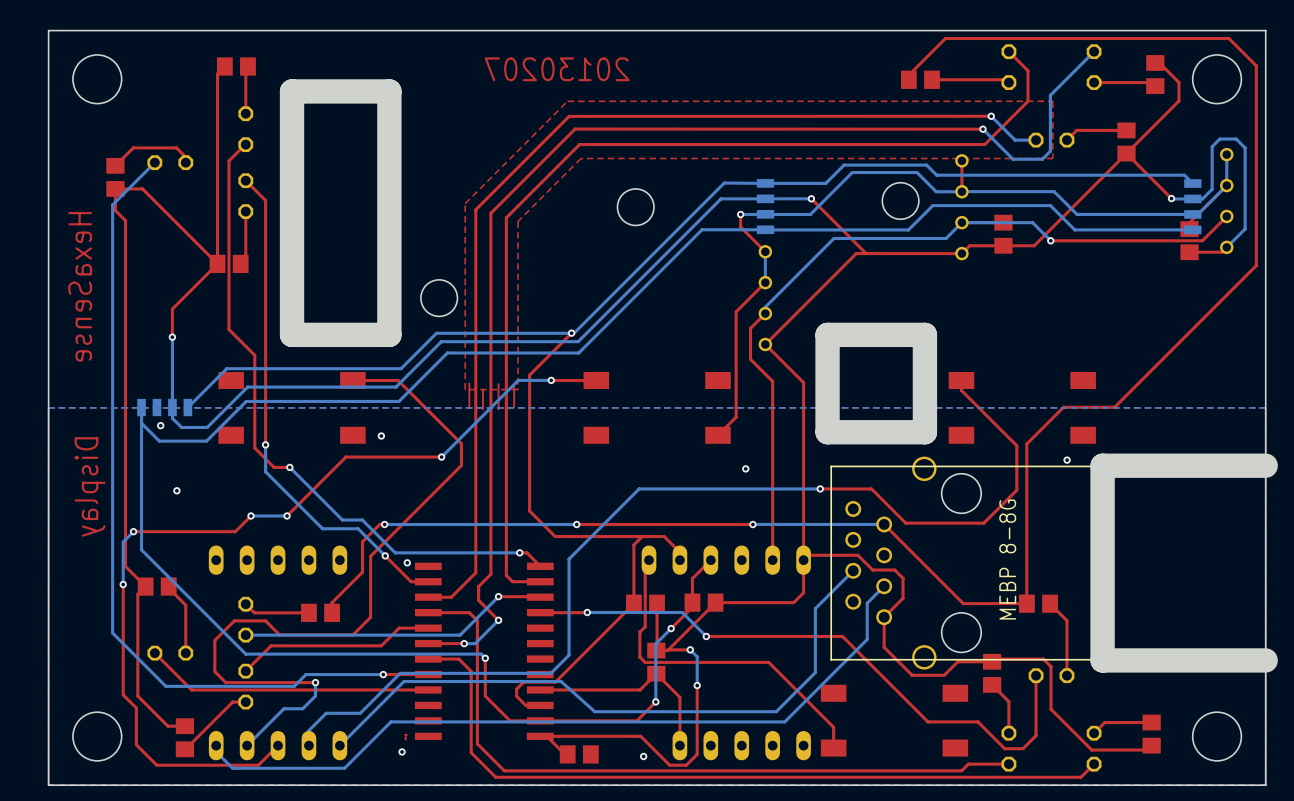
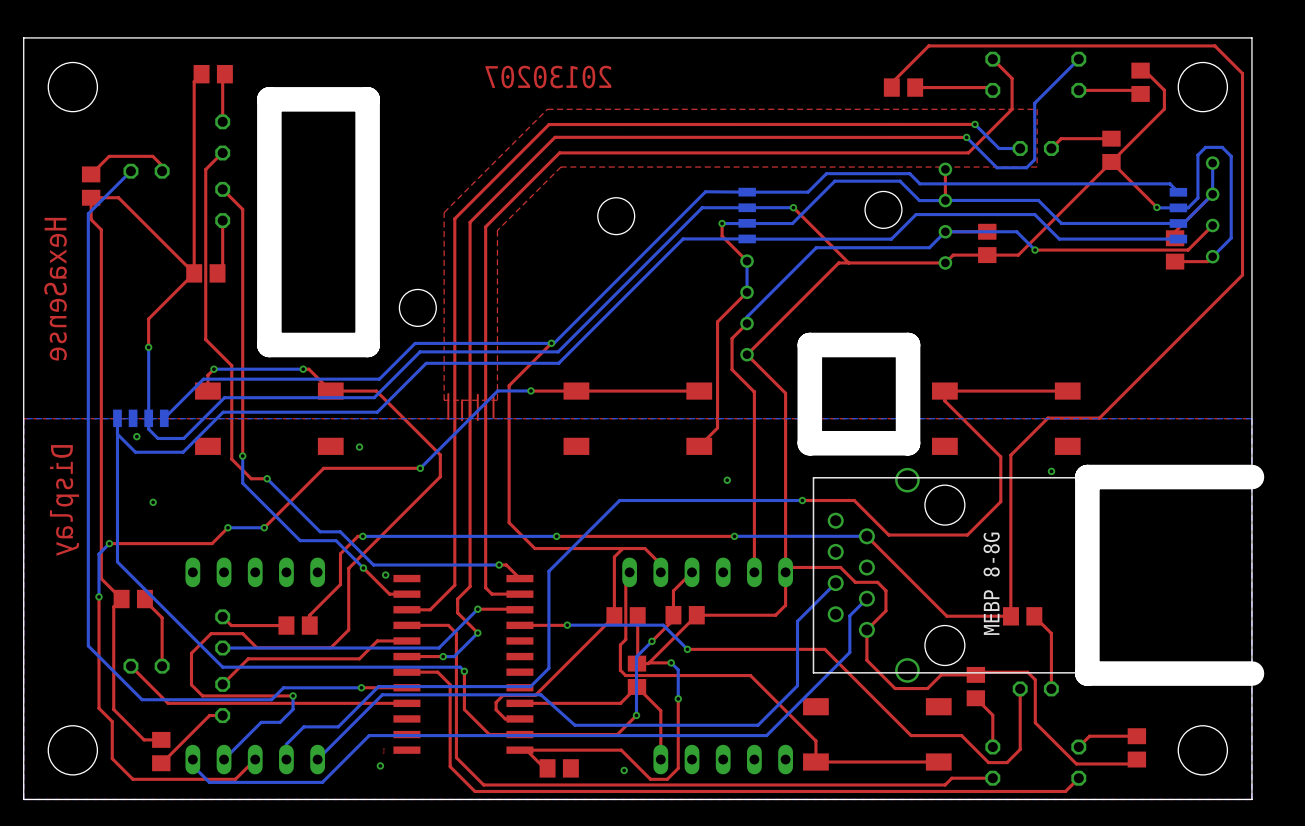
top track: none -> (213, 369) (207, 375) (207, 391)
via: none -> (213, 369)
bottom track: none -> (303, 369) (213, 369)
top track: none -> (303, 369) (308, 369) (330, 391)
via: none -> (303, 369)
top track: none -> (699, 391) (576, 391)
top track: none -> (1067, 391) (944, 391)
top track: none -> (938, 762) (815, 762)

